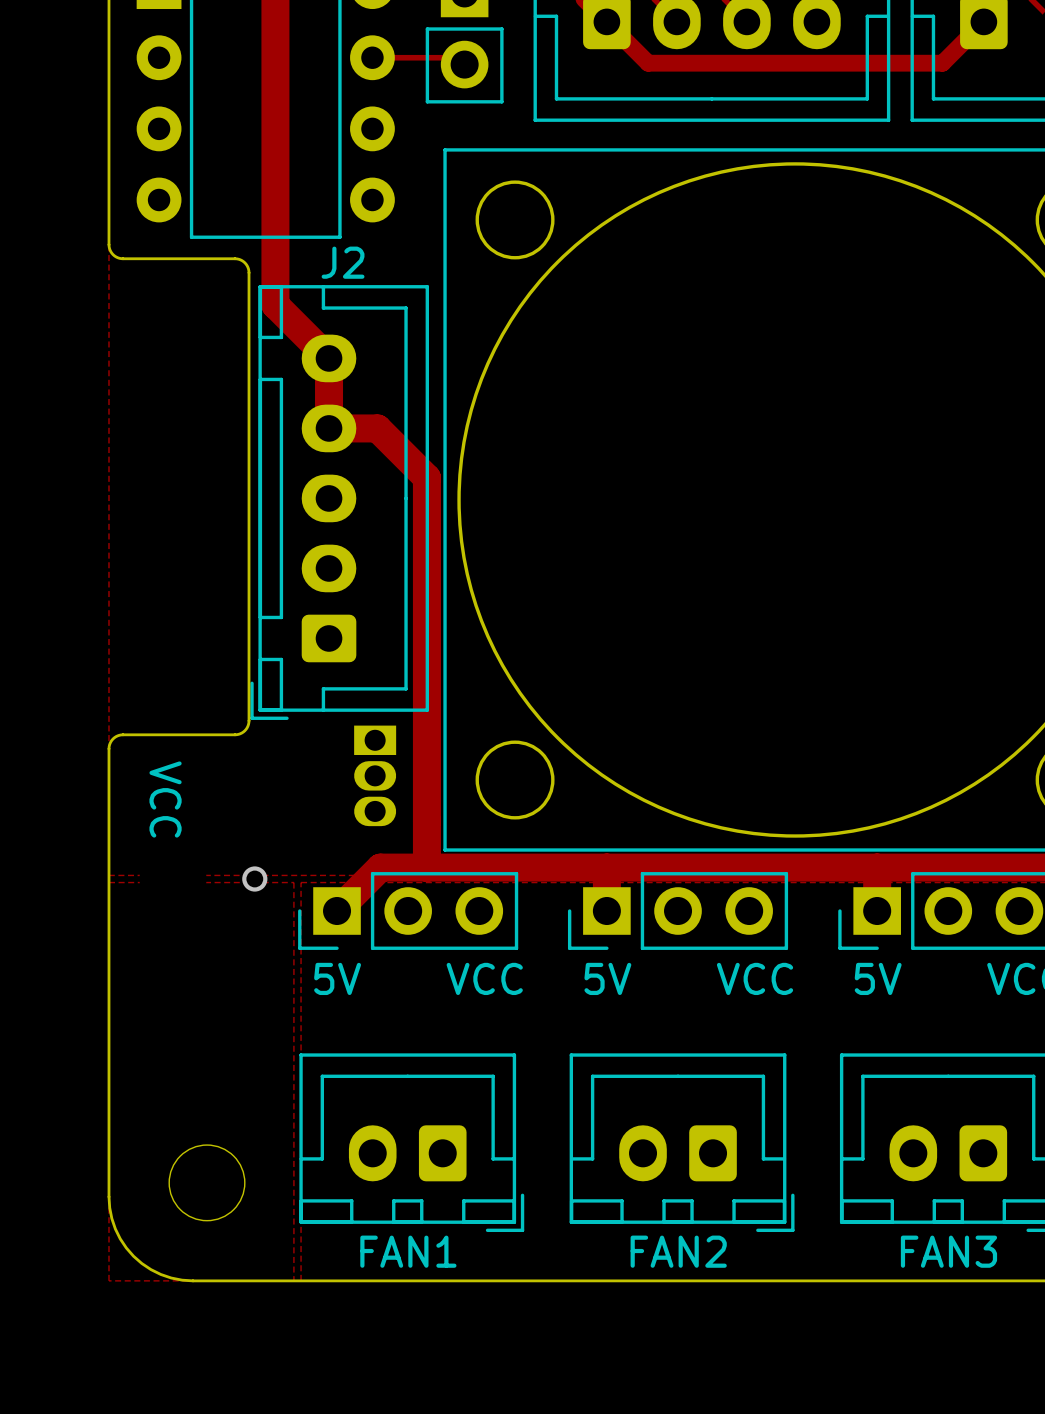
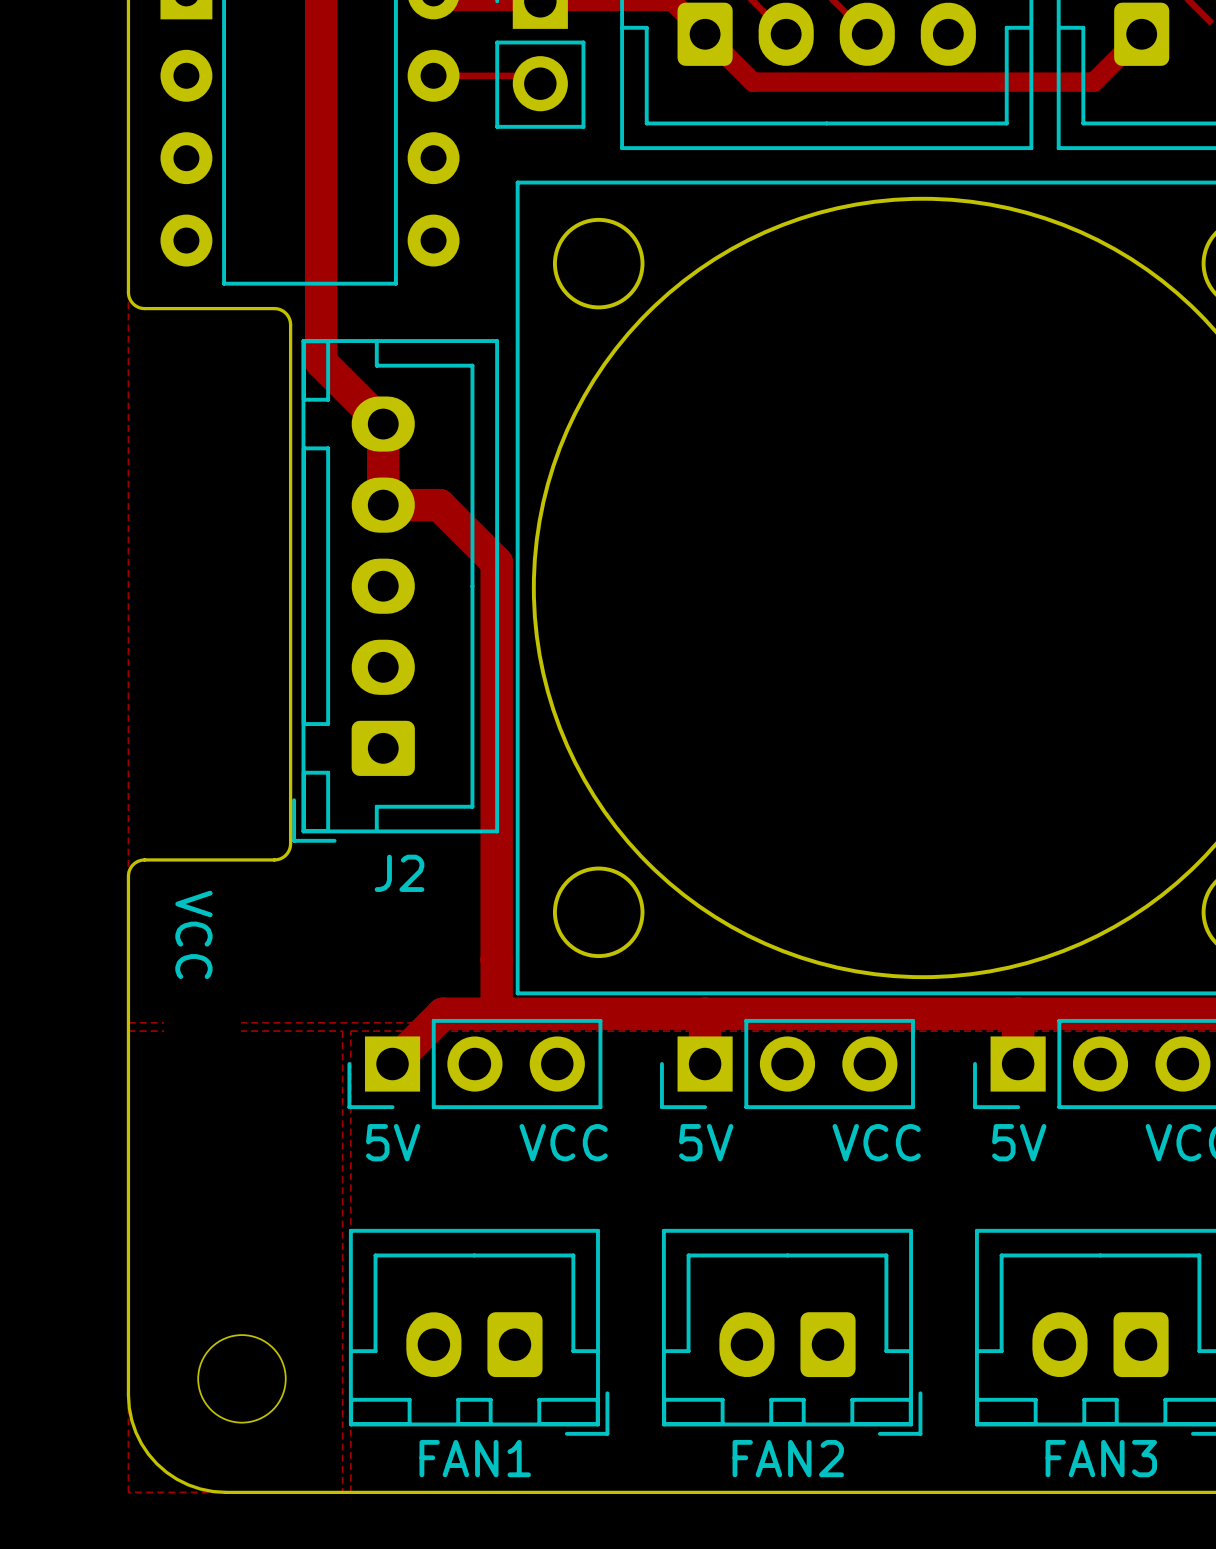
J2 name position: J2 (343, 262) -> J2 (399, 873)
part: (375, 775) -> none
via: (254, 878) -> none

